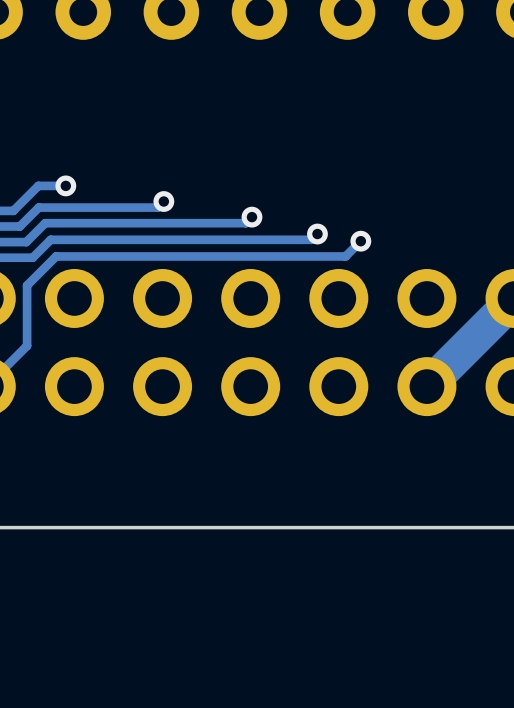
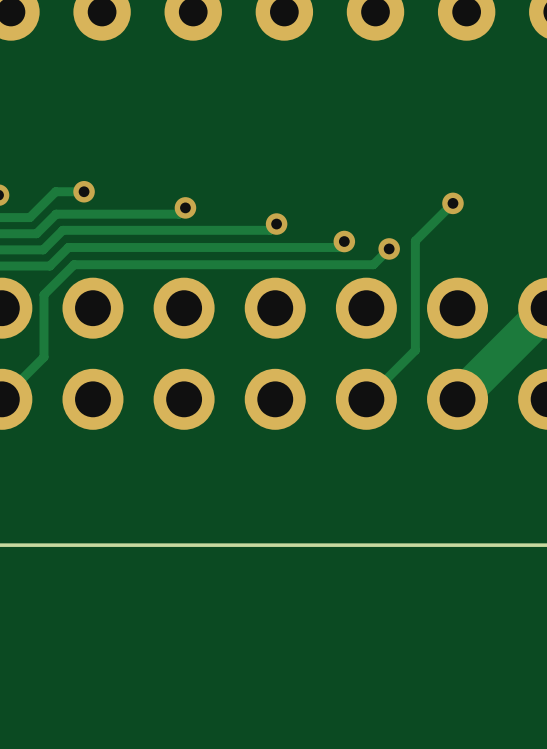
track: none -> (452, 203) (415, 240) (415, 350) (366, 399)
via: none -> (452, 203)

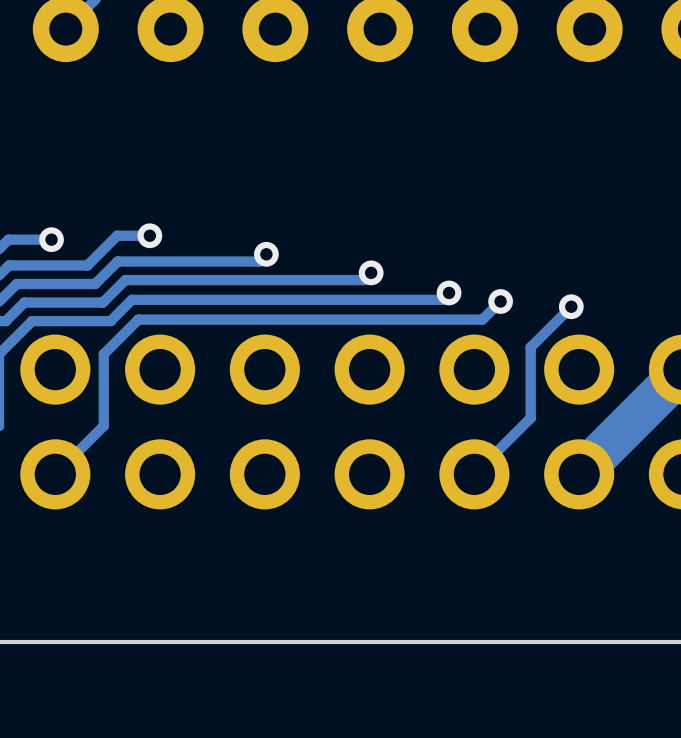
track: (452, 203) (415, 240) (415, 288) -> (571, 306) (530, 347)
via position: (452, 203) -> (571, 306)

